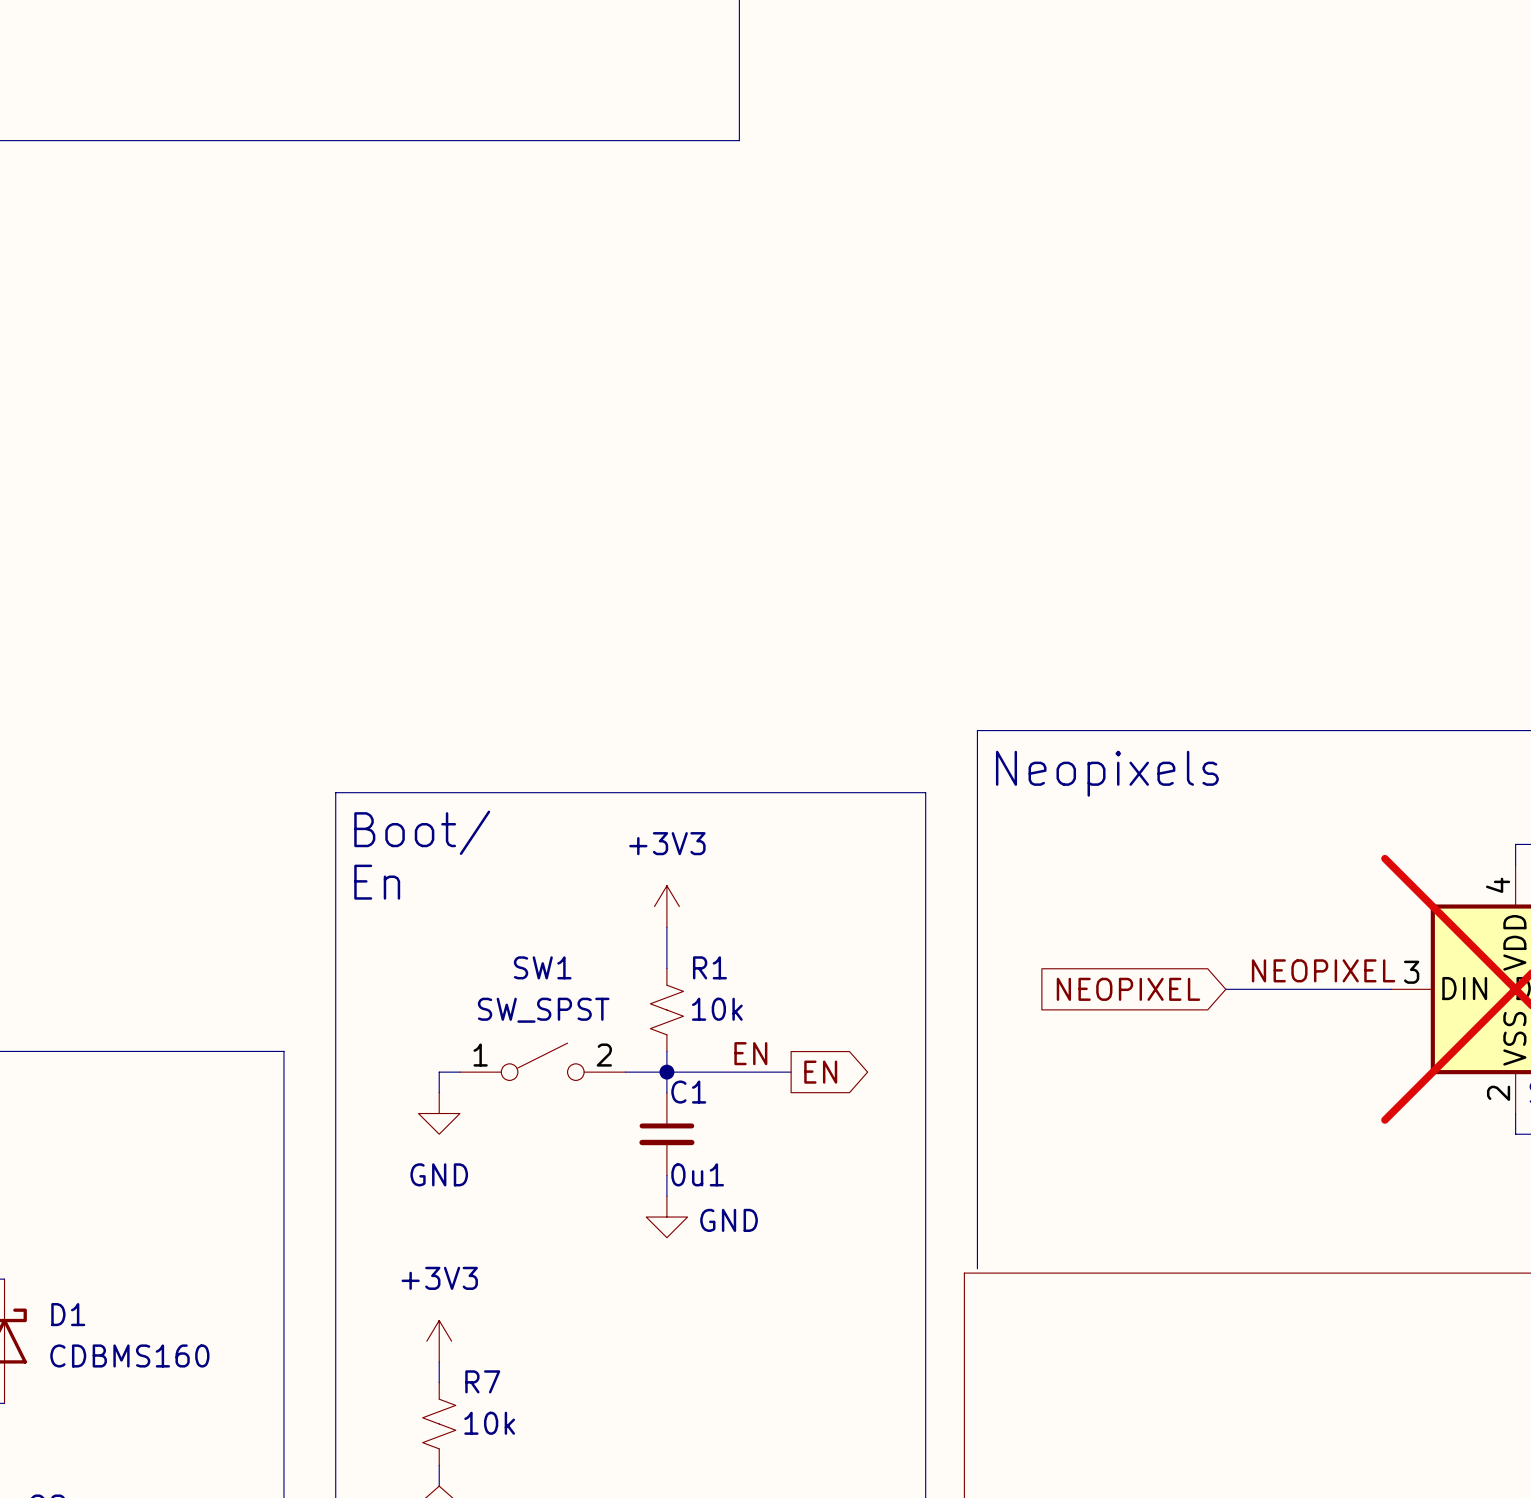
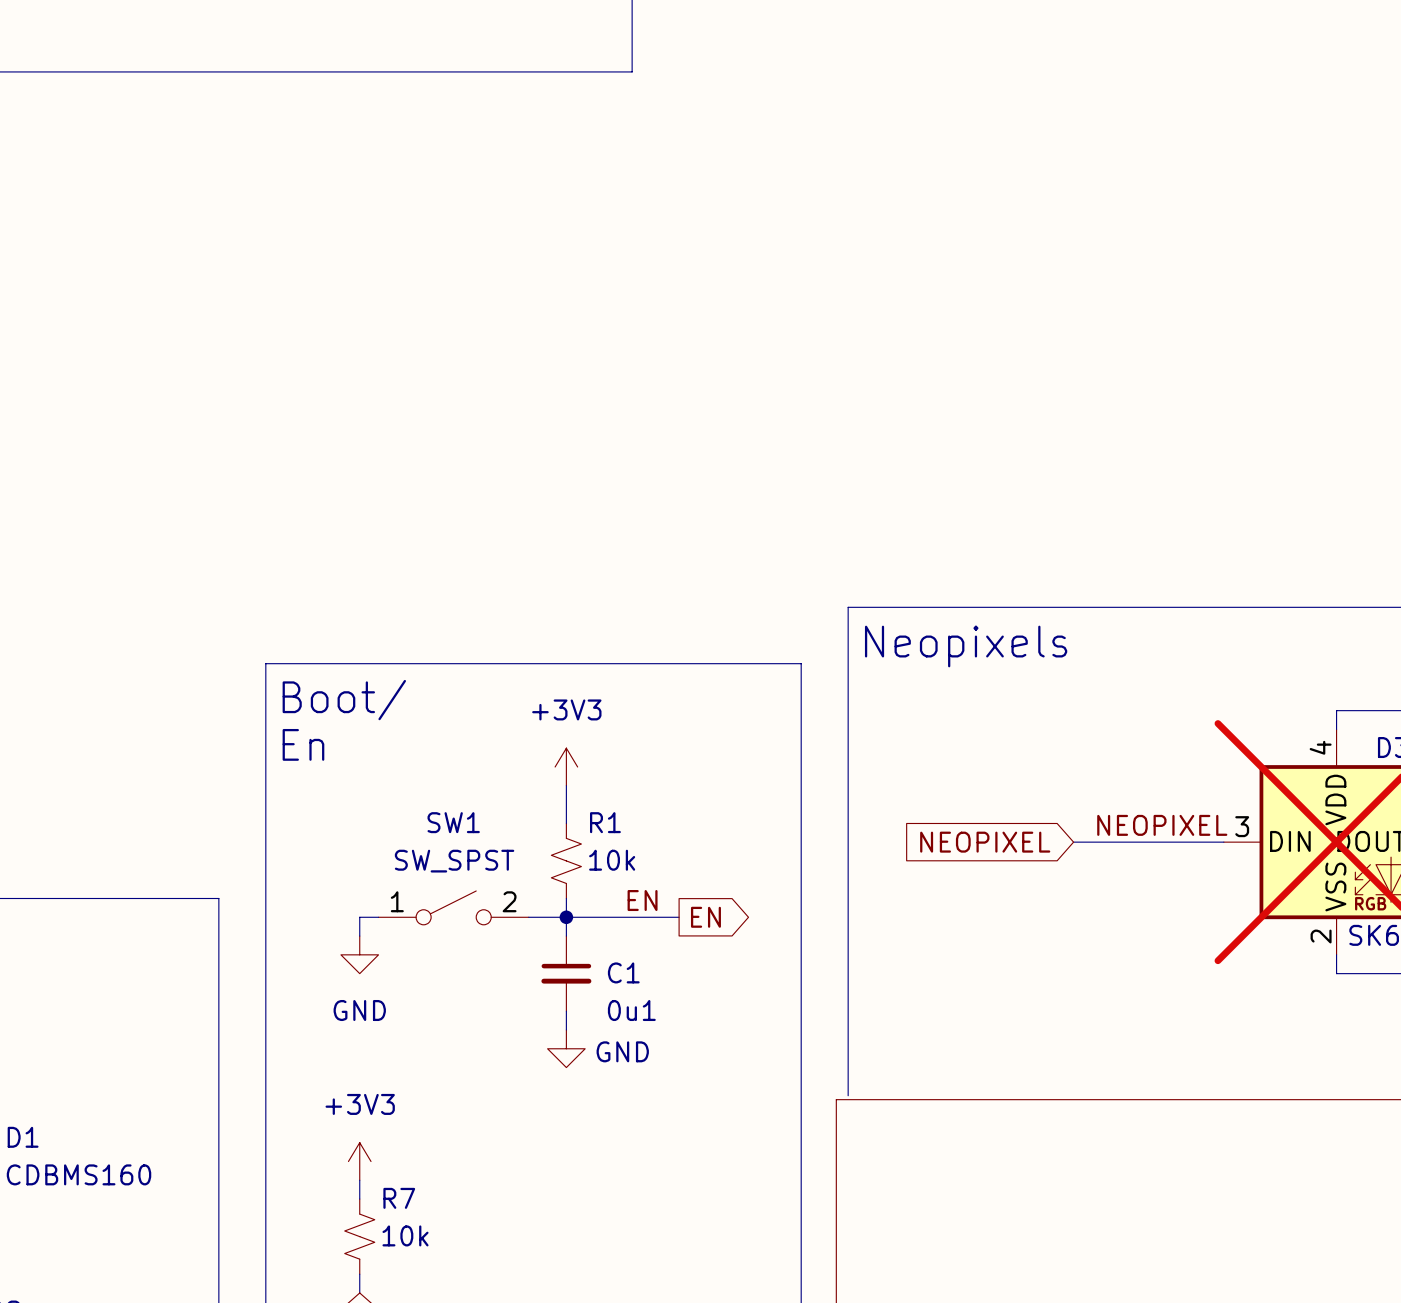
C1 name position: C1 (688, 1092) -> C1 (623, 972)
C1 value position: 0u1 (697, 1174) -> 0u1 (631, 1010)

